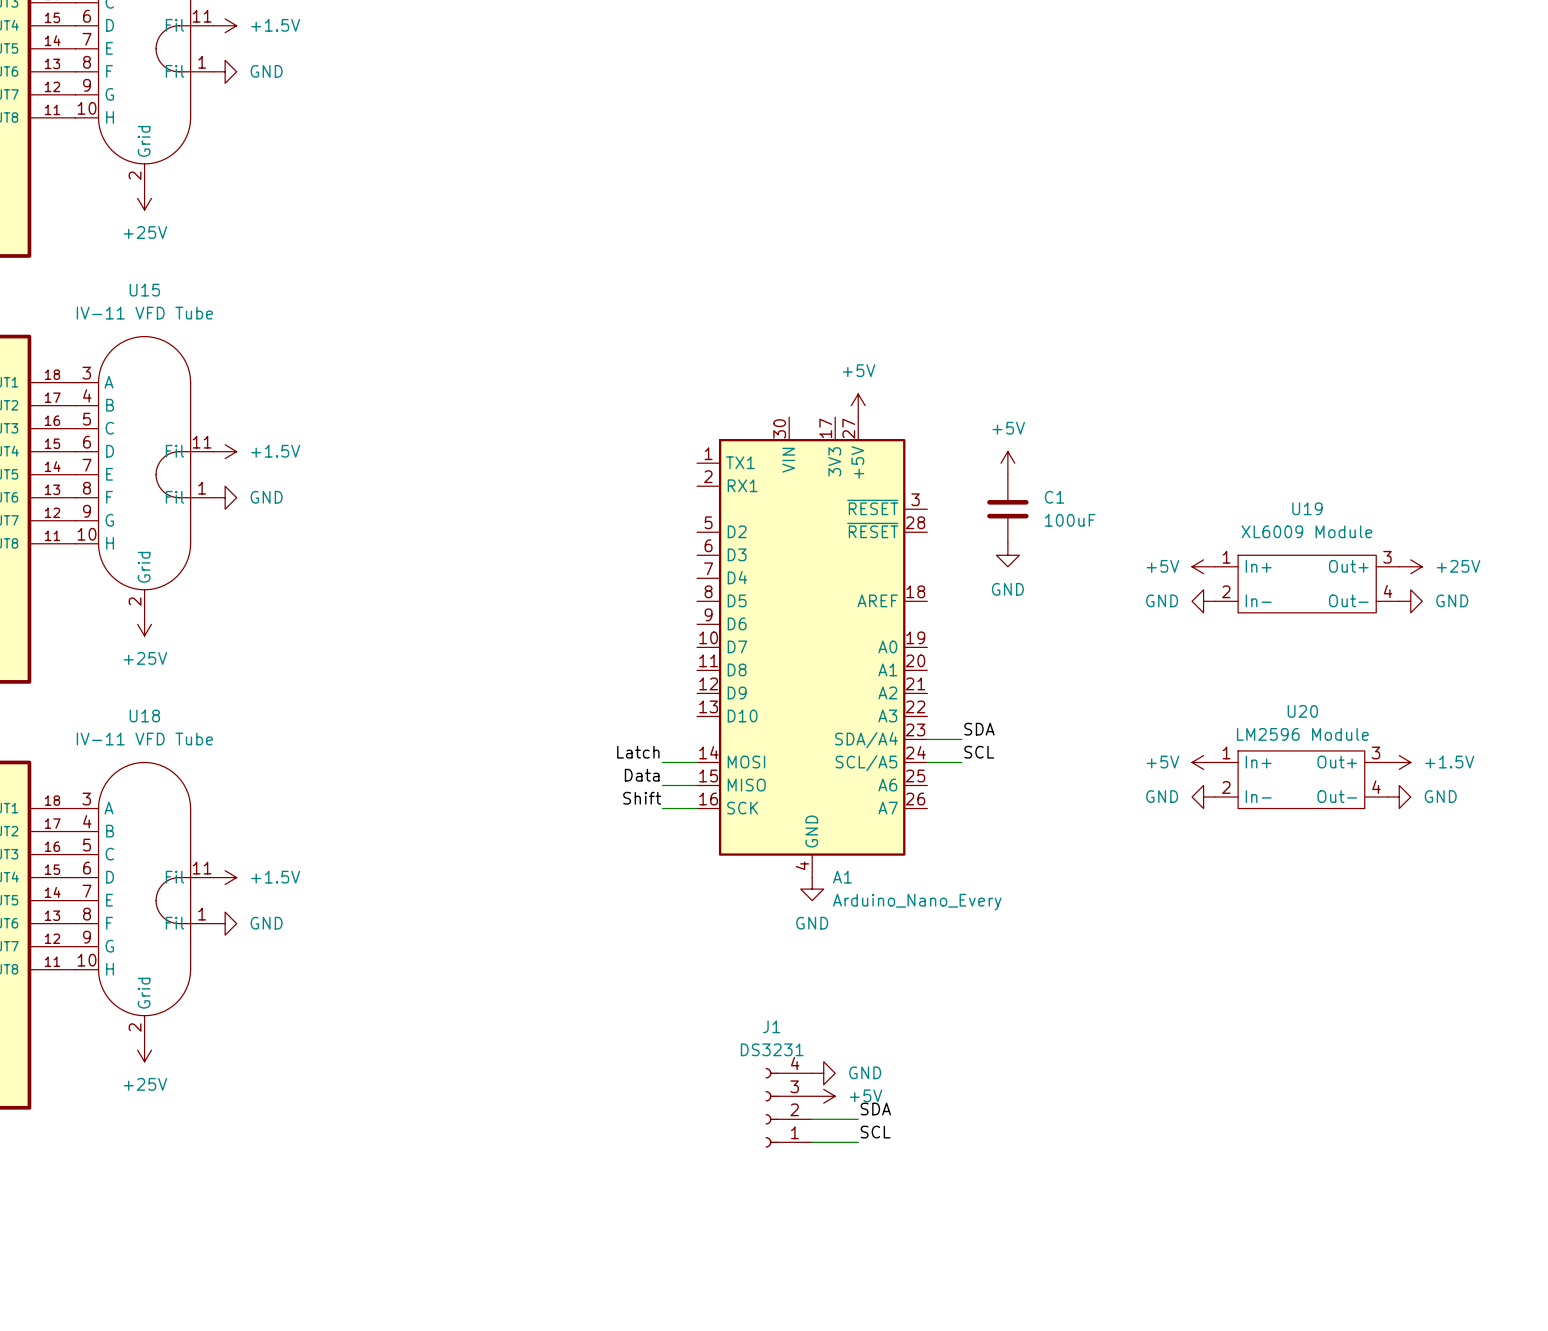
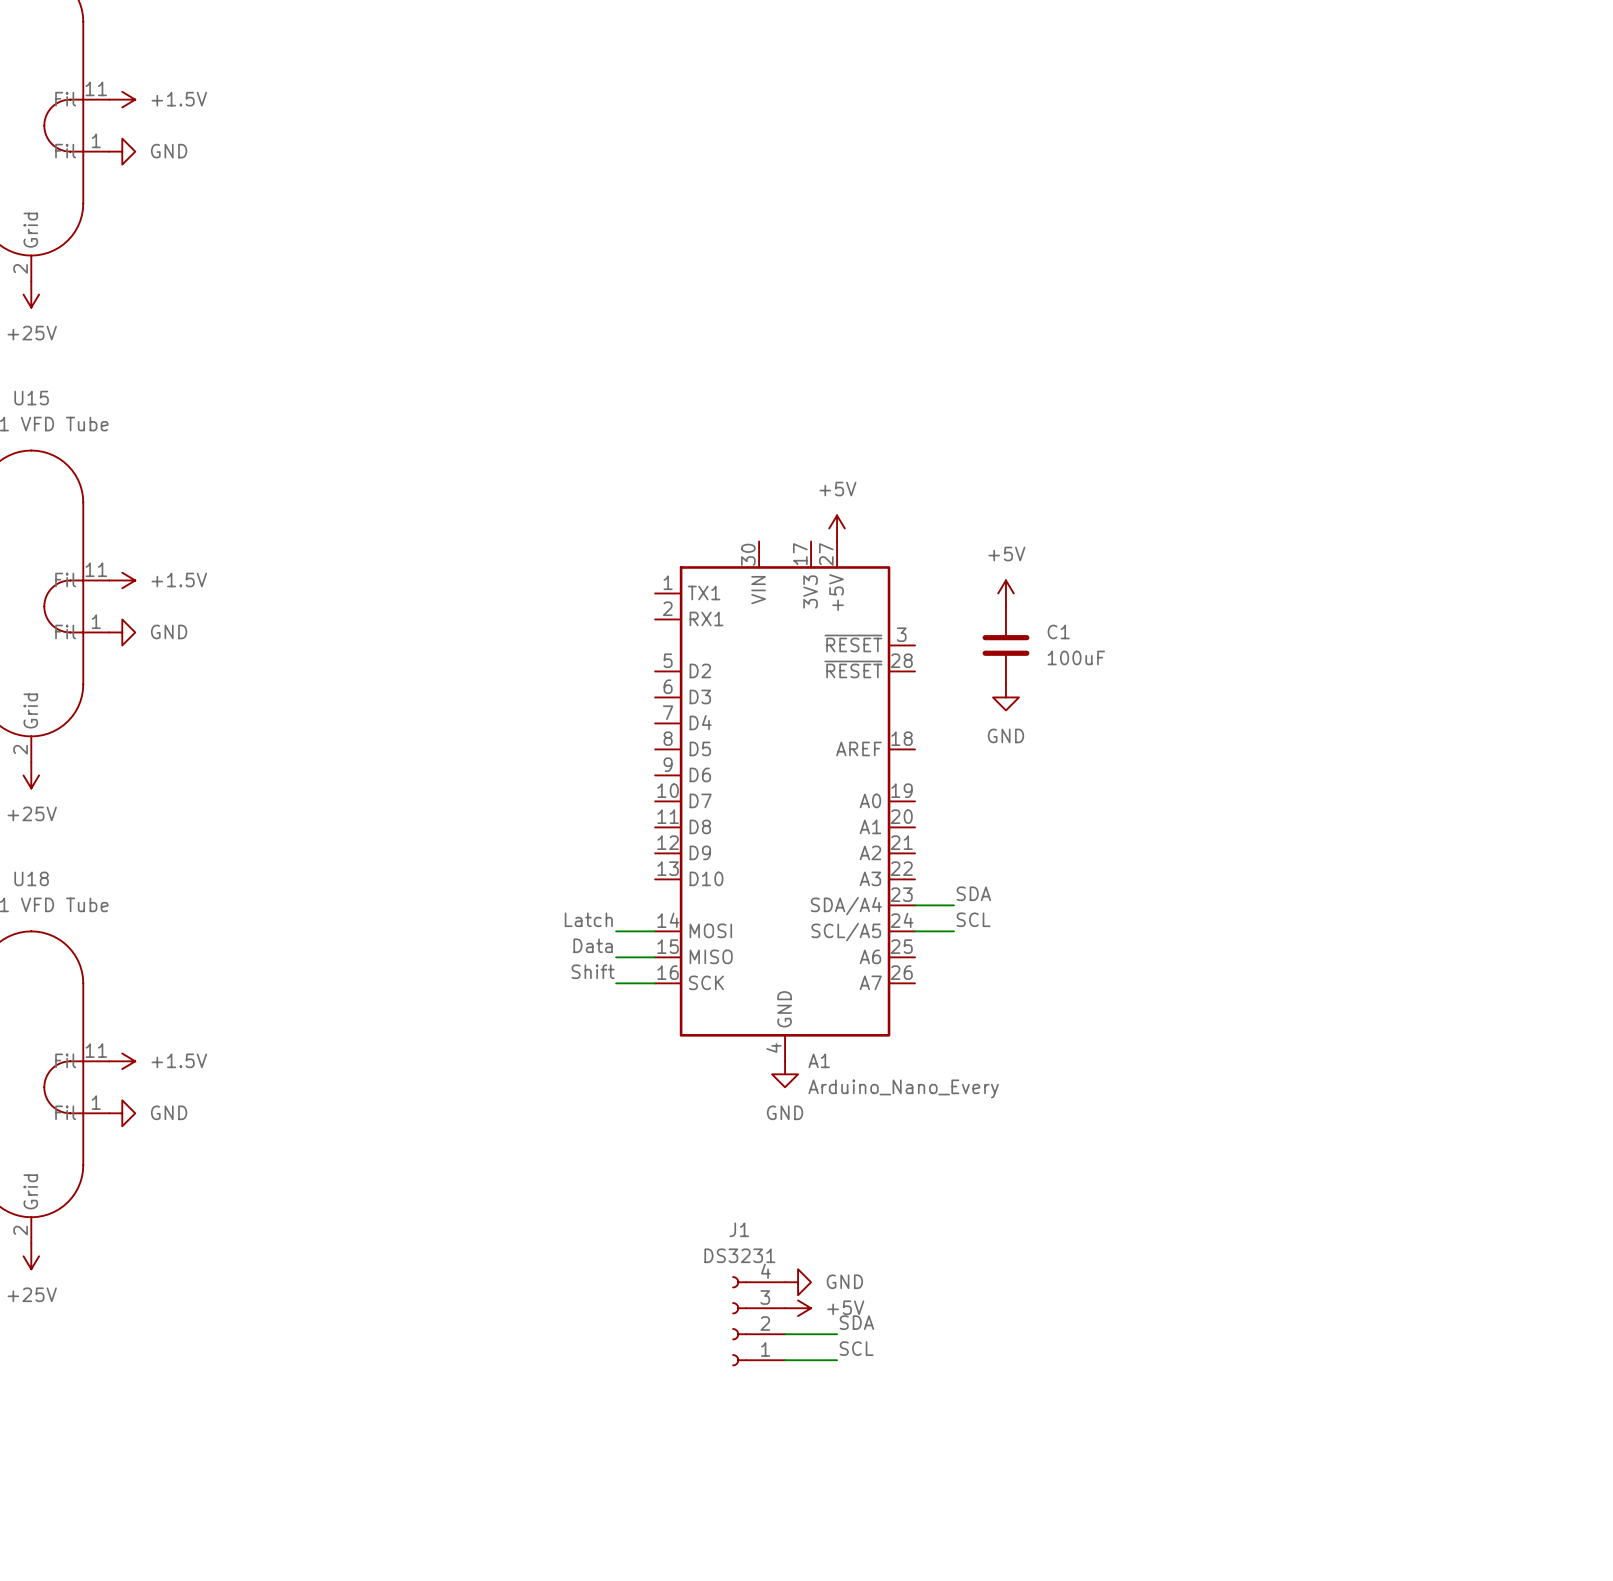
power symbol: +5V (1203, 566) -> none
power symbol: +25V (1410, 566) -> none
U19: XL6009 Module (1307, 584) -> none
power symbol: GND (1203, 601) -> none
power symbol: GND (1410, 601) -> none
power symbol: +5V (1203, 762) -> none
power symbol: +1.5V (1399, 762) -> none
U20: LM2596 Module (1301, 779) -> none
power symbol: GND (1203, 797) -> none
power symbol: GND (1399, 797) -> none

